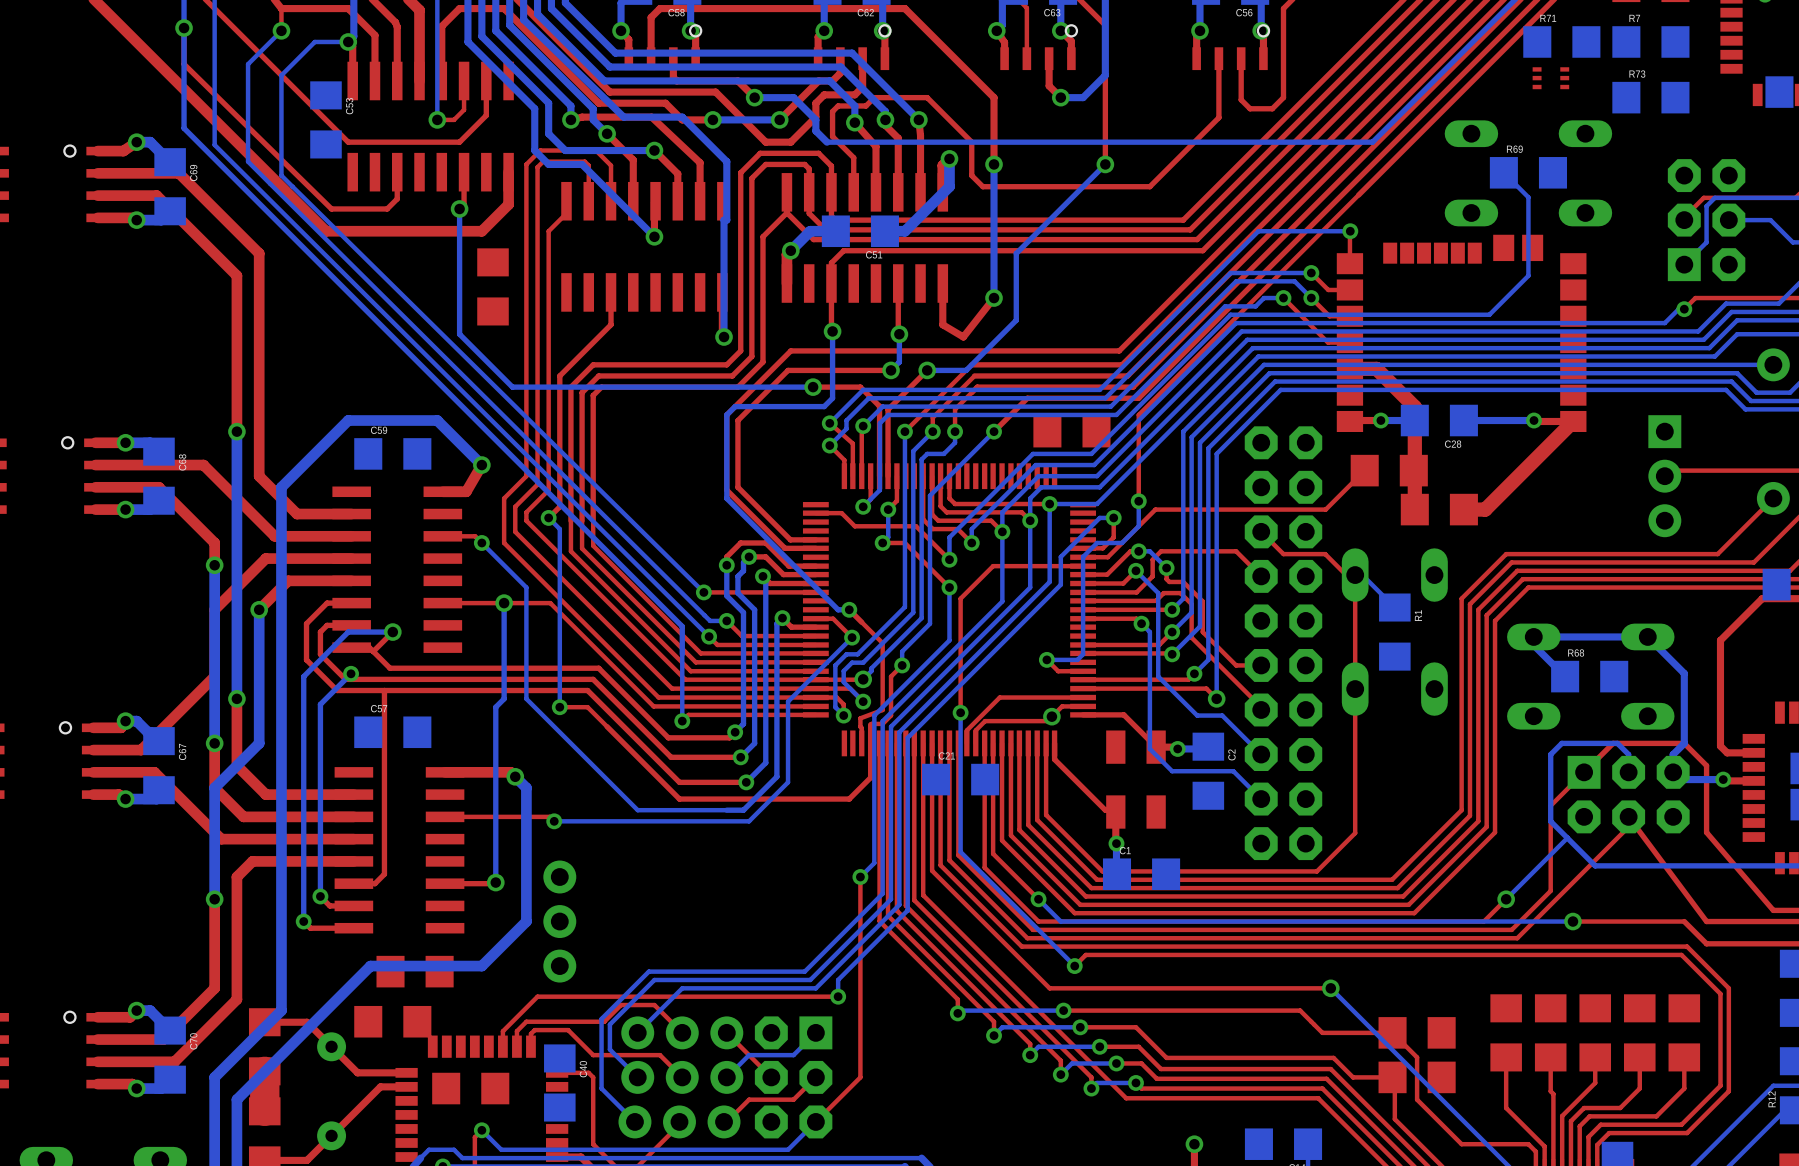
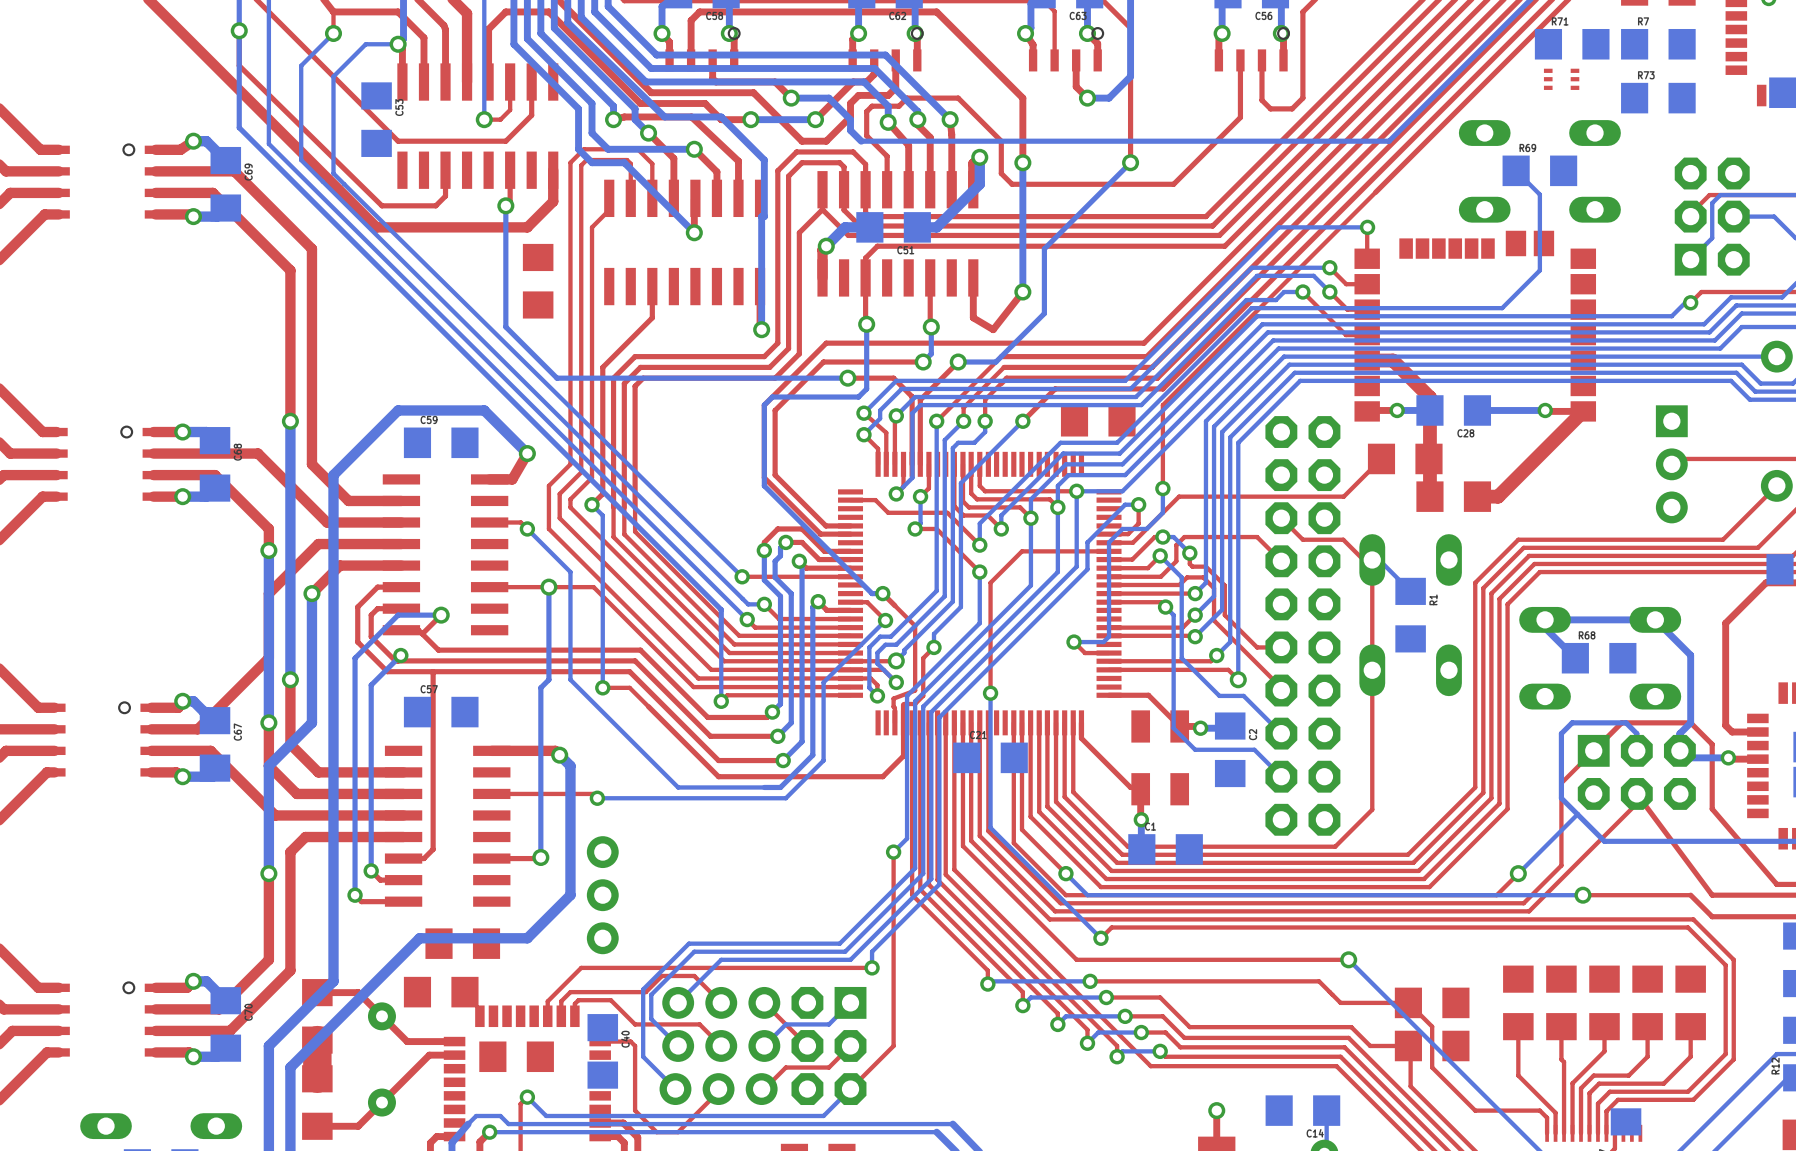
top track: (1083, 697) (999, 697) (966, 730) (966, 743) -> none
top track: (1083, 706) (1062, 706) (1047, 721) (985, 721) (975, 730) (975, 743) -> none
via: (1051, 716) -> none

